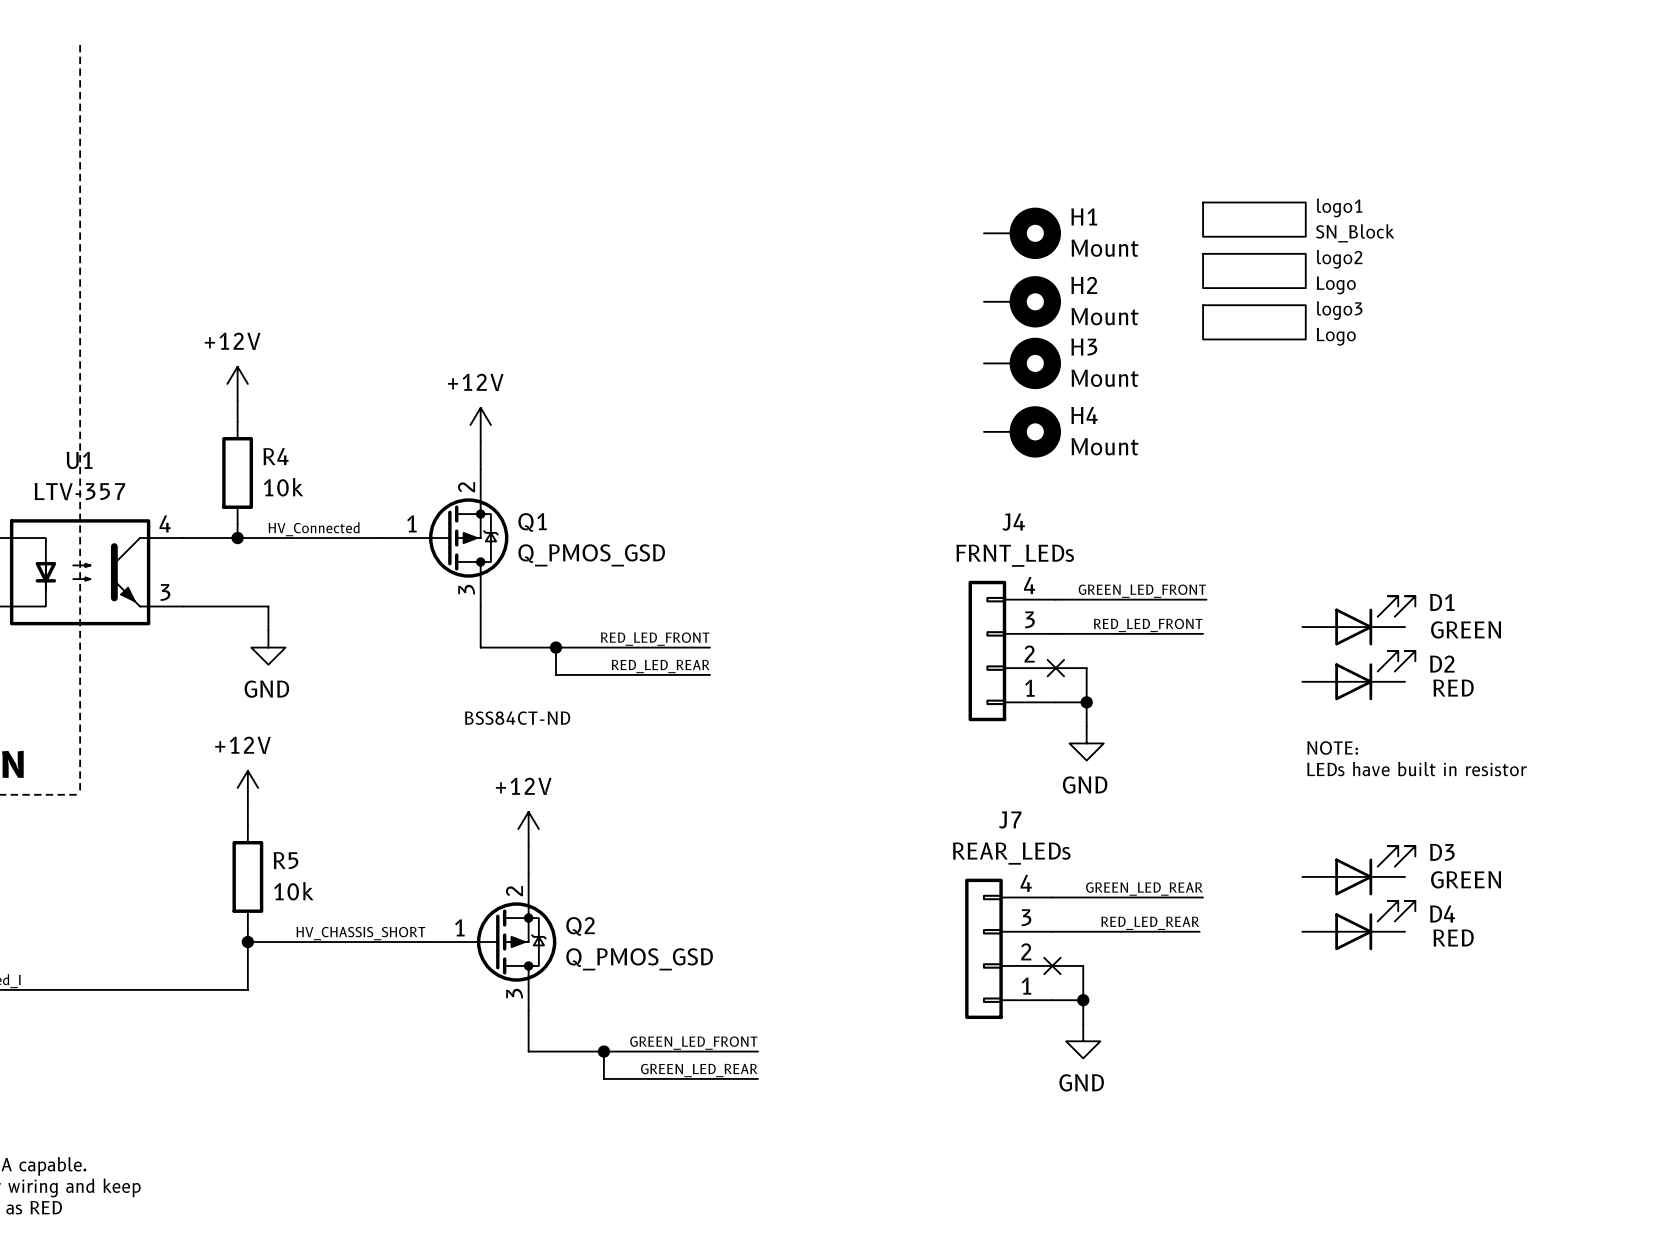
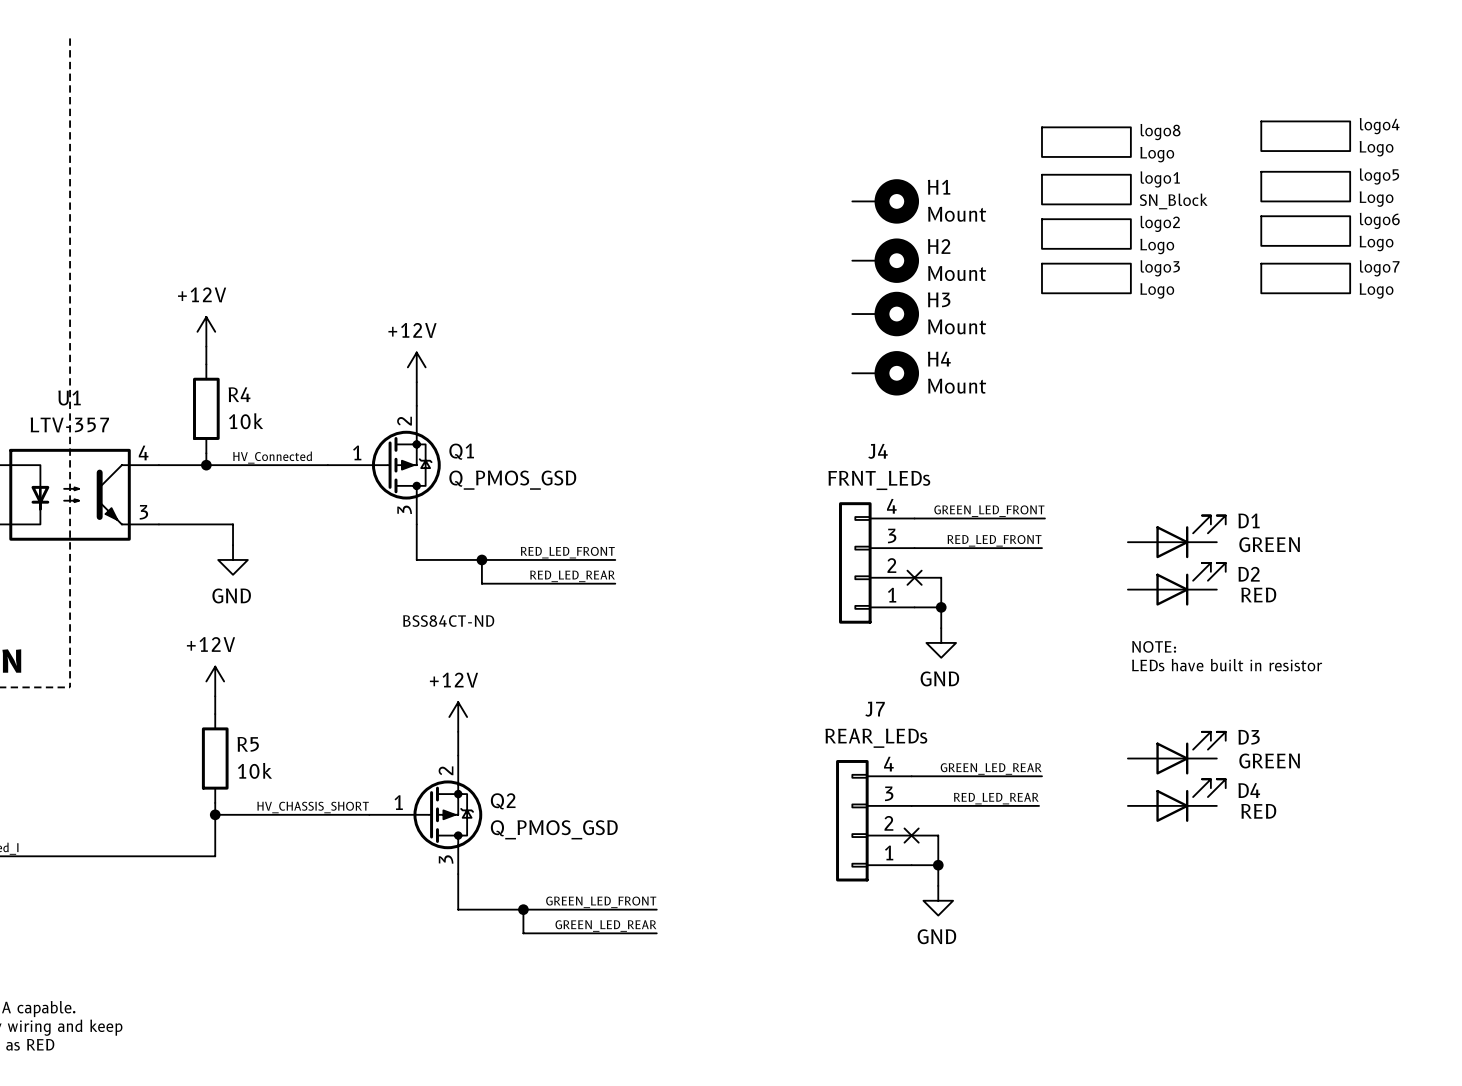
logo4: none -> Logo (1305, 136)
logo8: none -> Logo (1086, 142)
logo5: none -> Logo (1305, 186)
logo6: none -> Logo (1305, 231)
logo7: none -> Logo (1305, 278)

